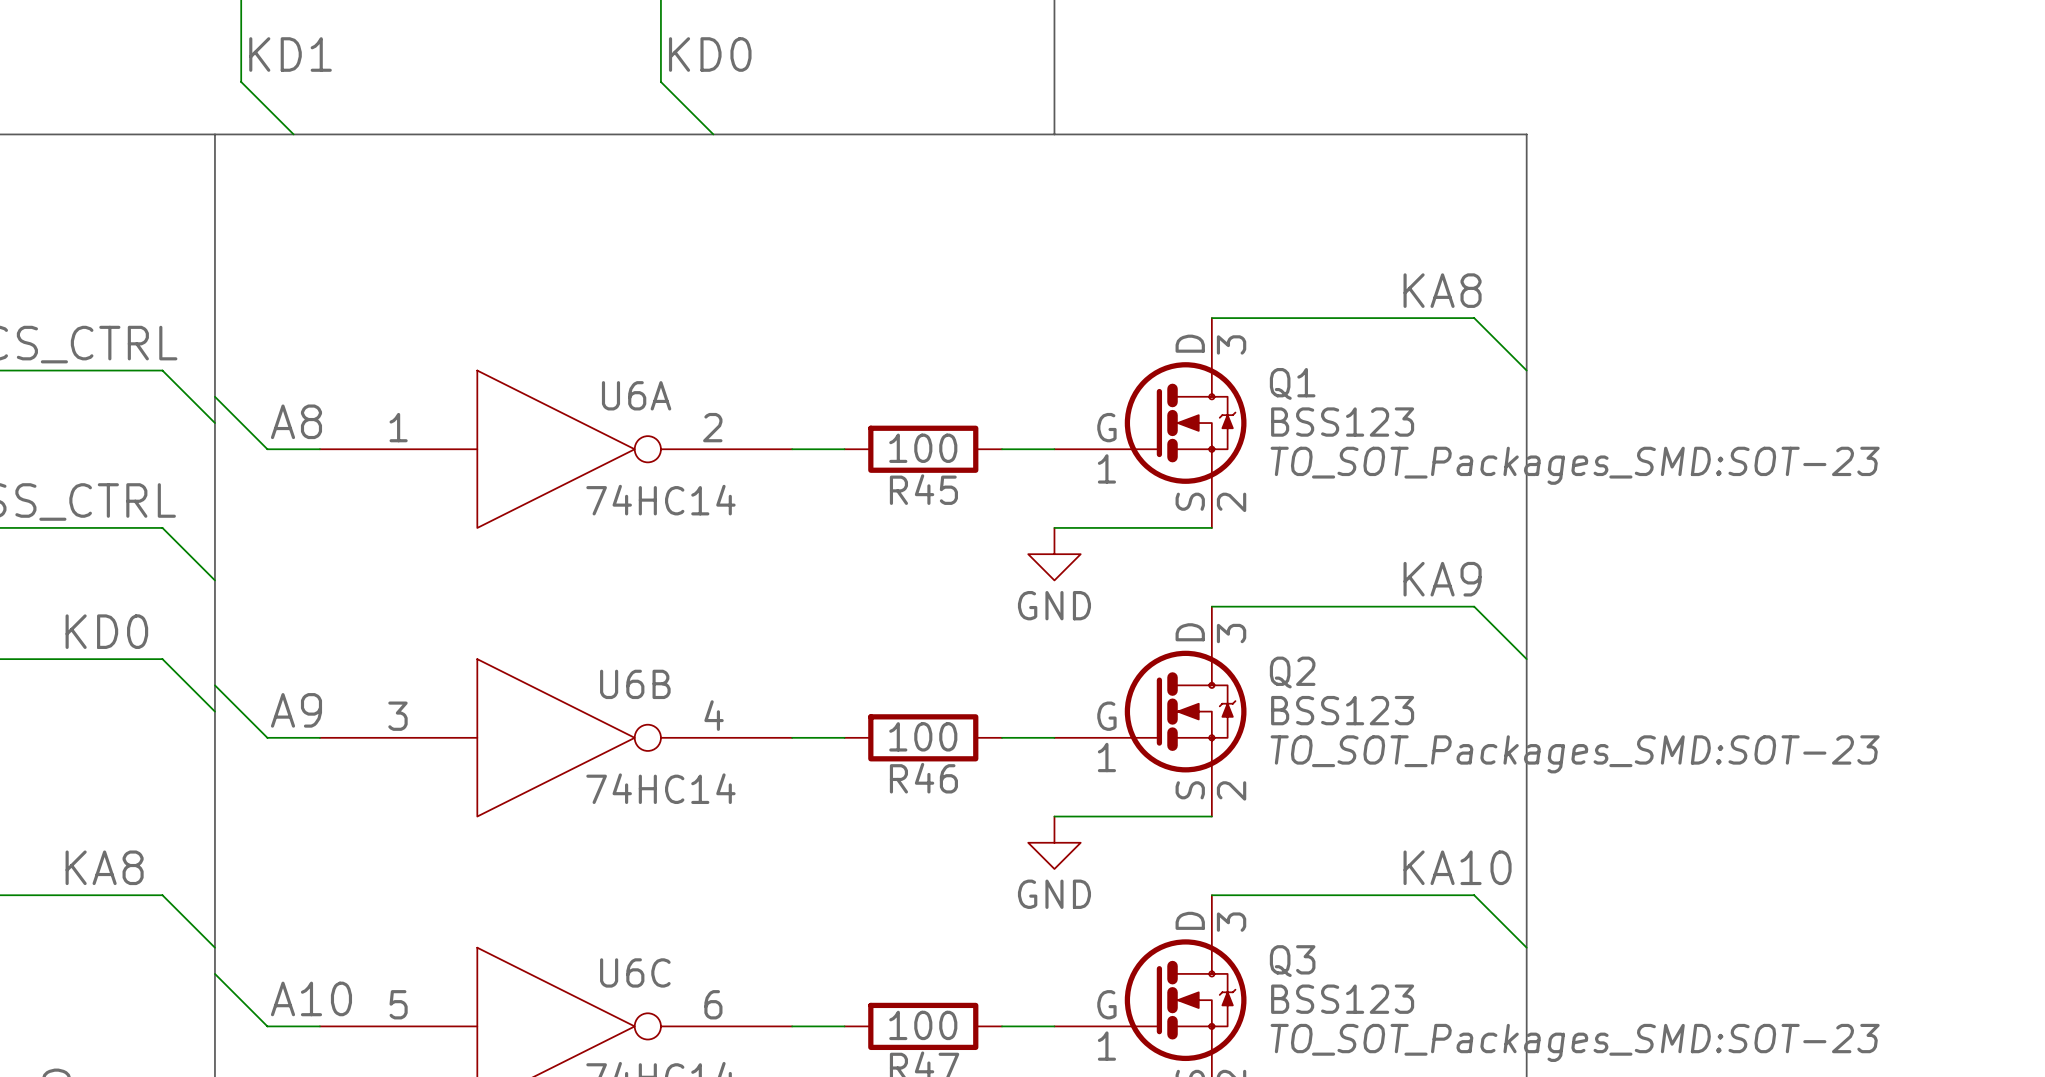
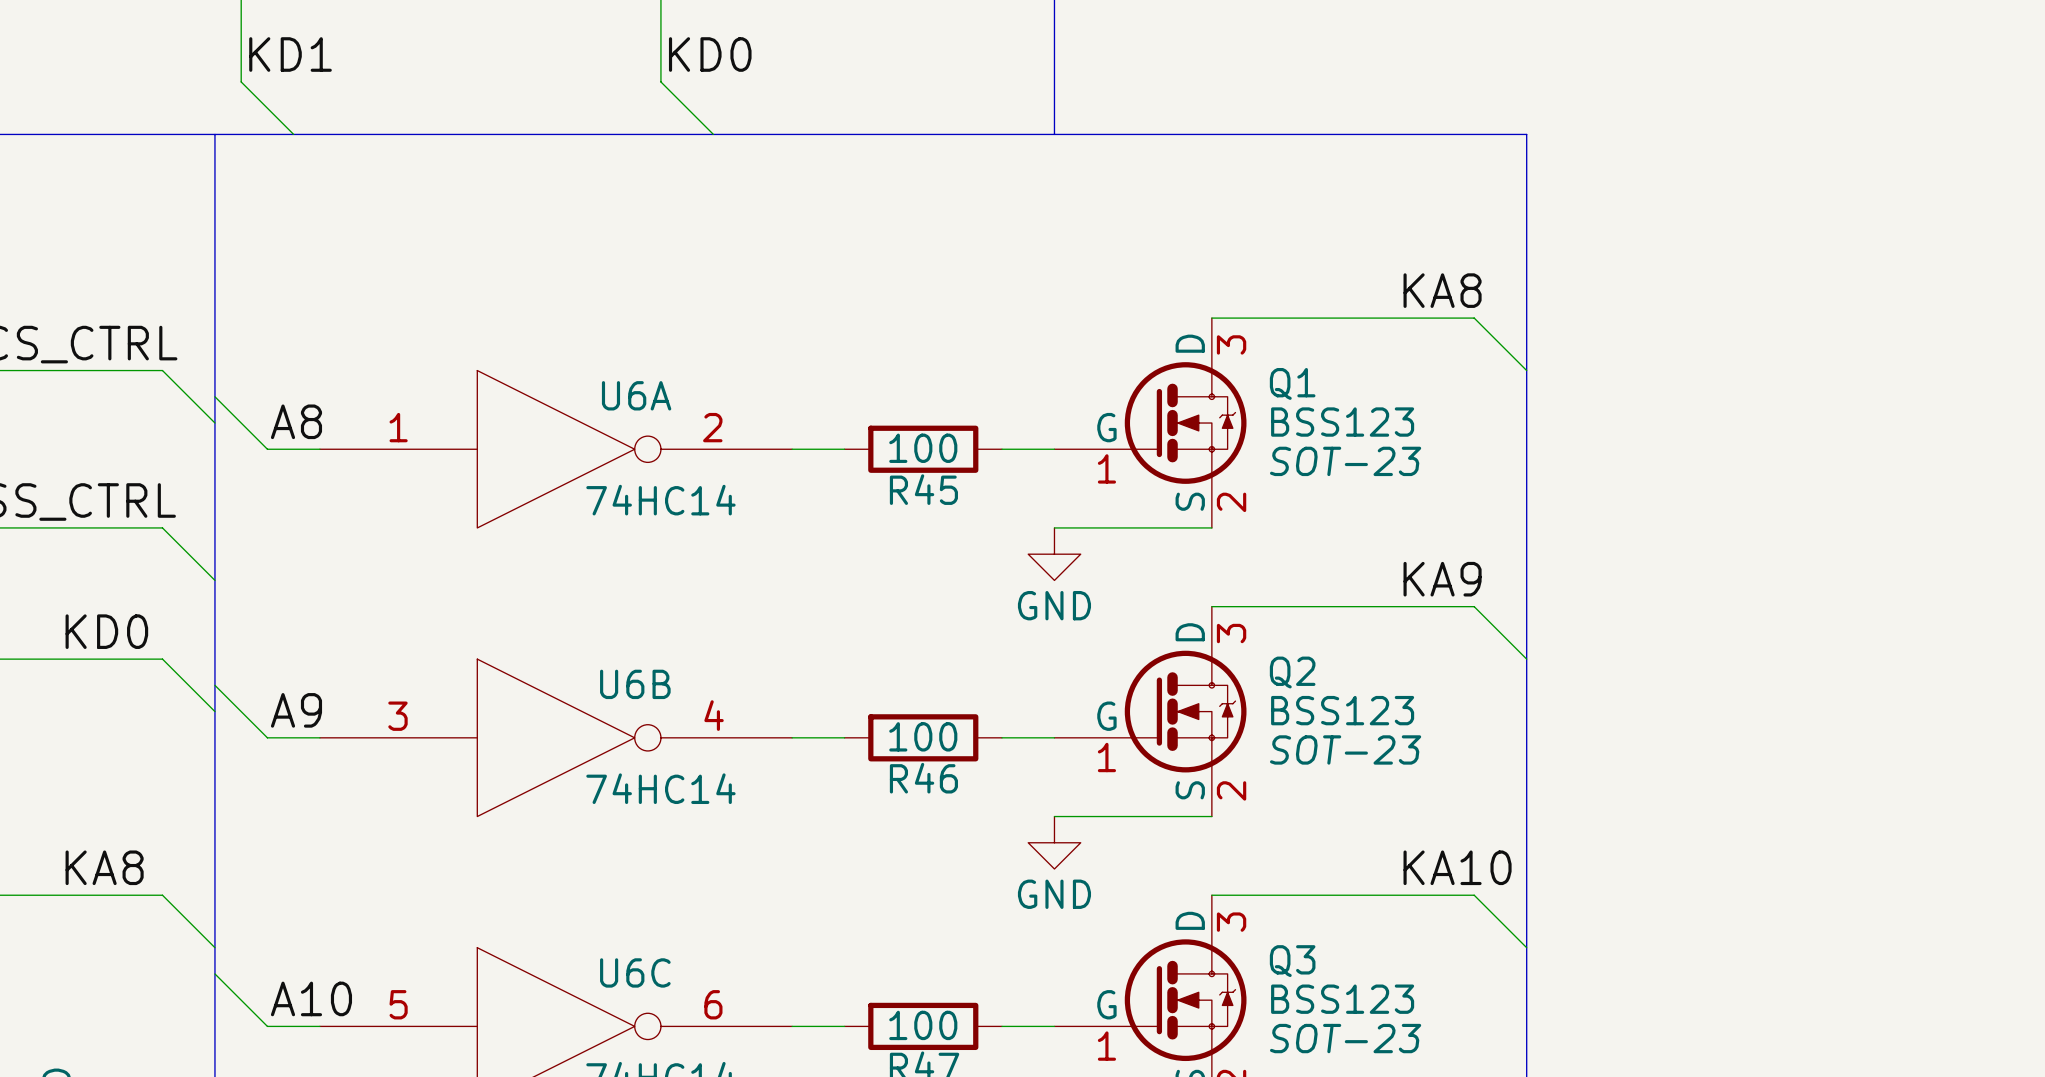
Q1 text: TO_SOT_Packages_SMD:SOT-23 (1575, 465) -> SOT-23 (1345, 461)
Q2 text: TO_SOT_Packages_SMD:SOT-23 (1575, 754) -> SOT-23 (1345, 749)
Q3 text: TO_SOT_Packages_SMD:SOT-23 (1575, 1042) -> SOT-23 (1345, 1038)

